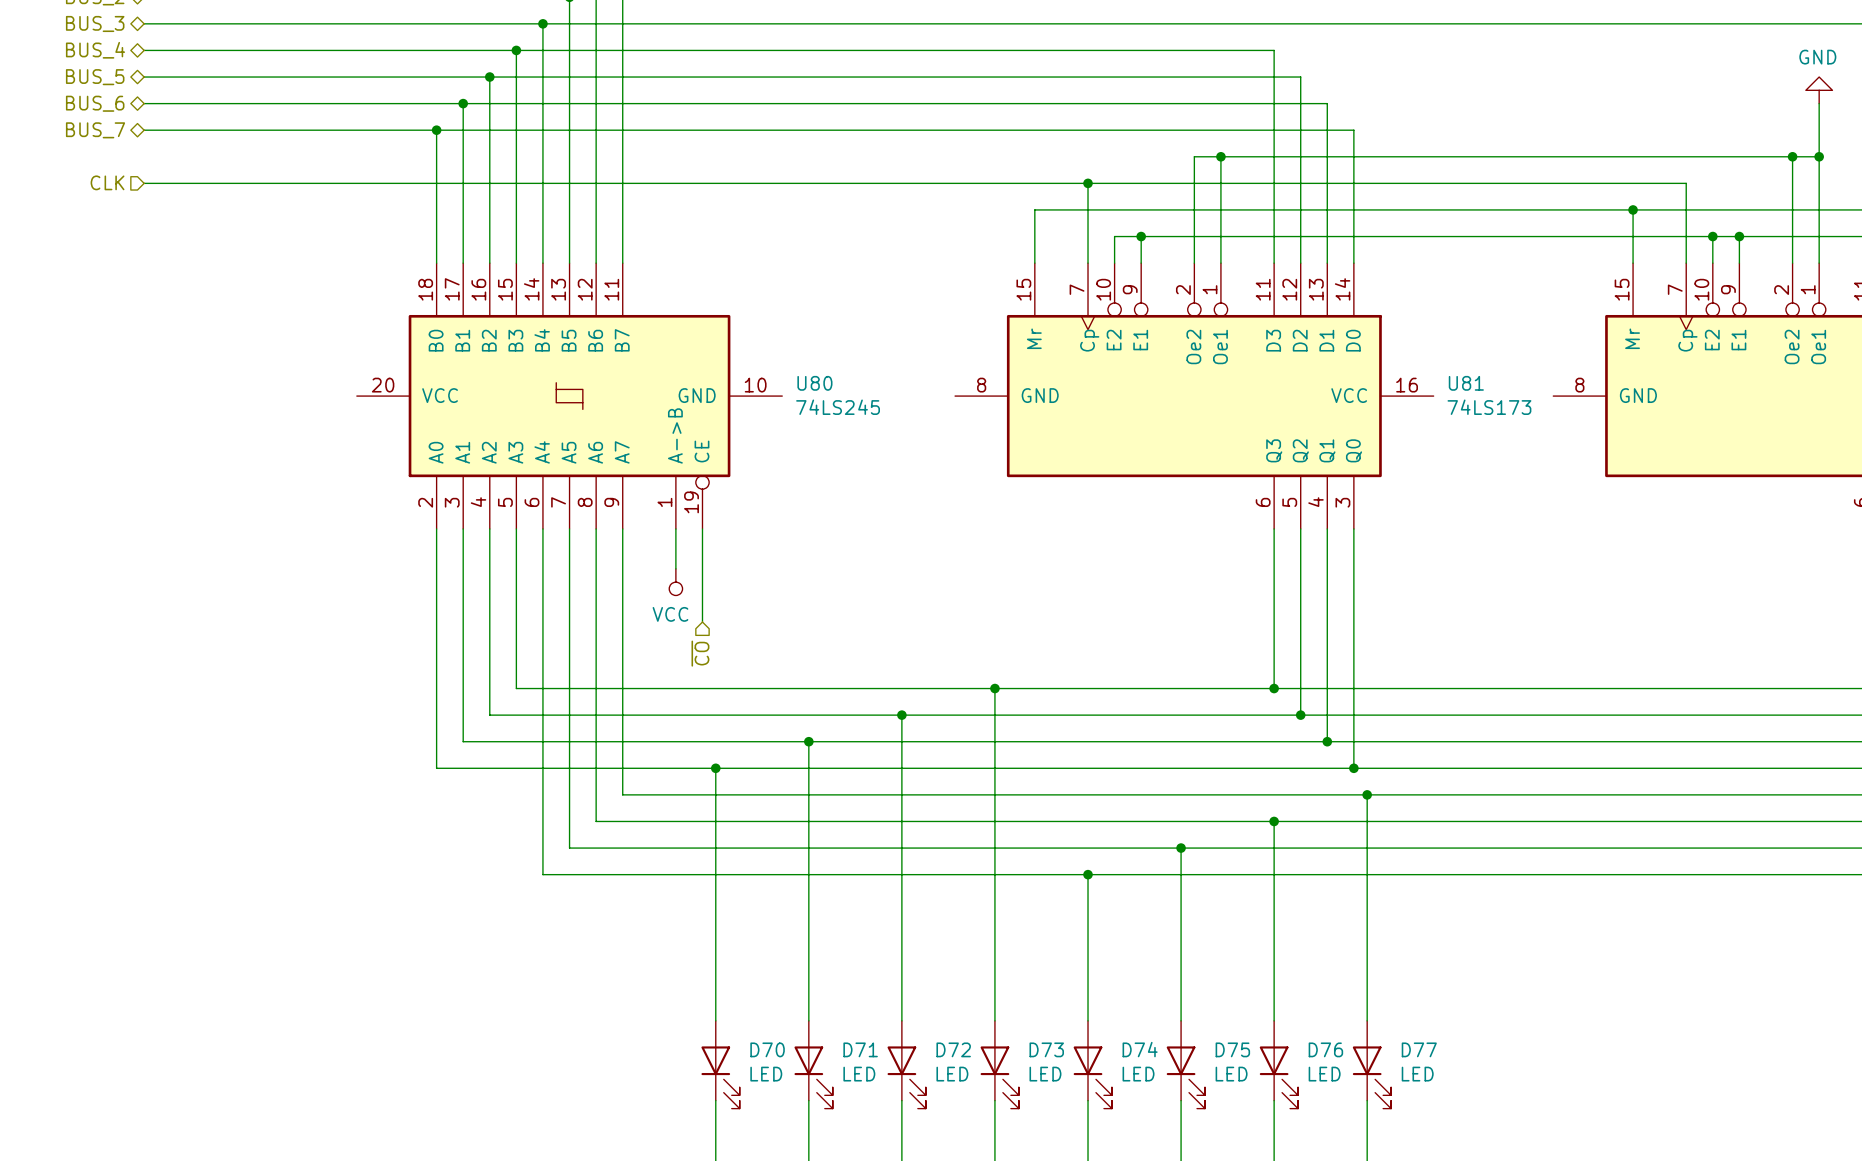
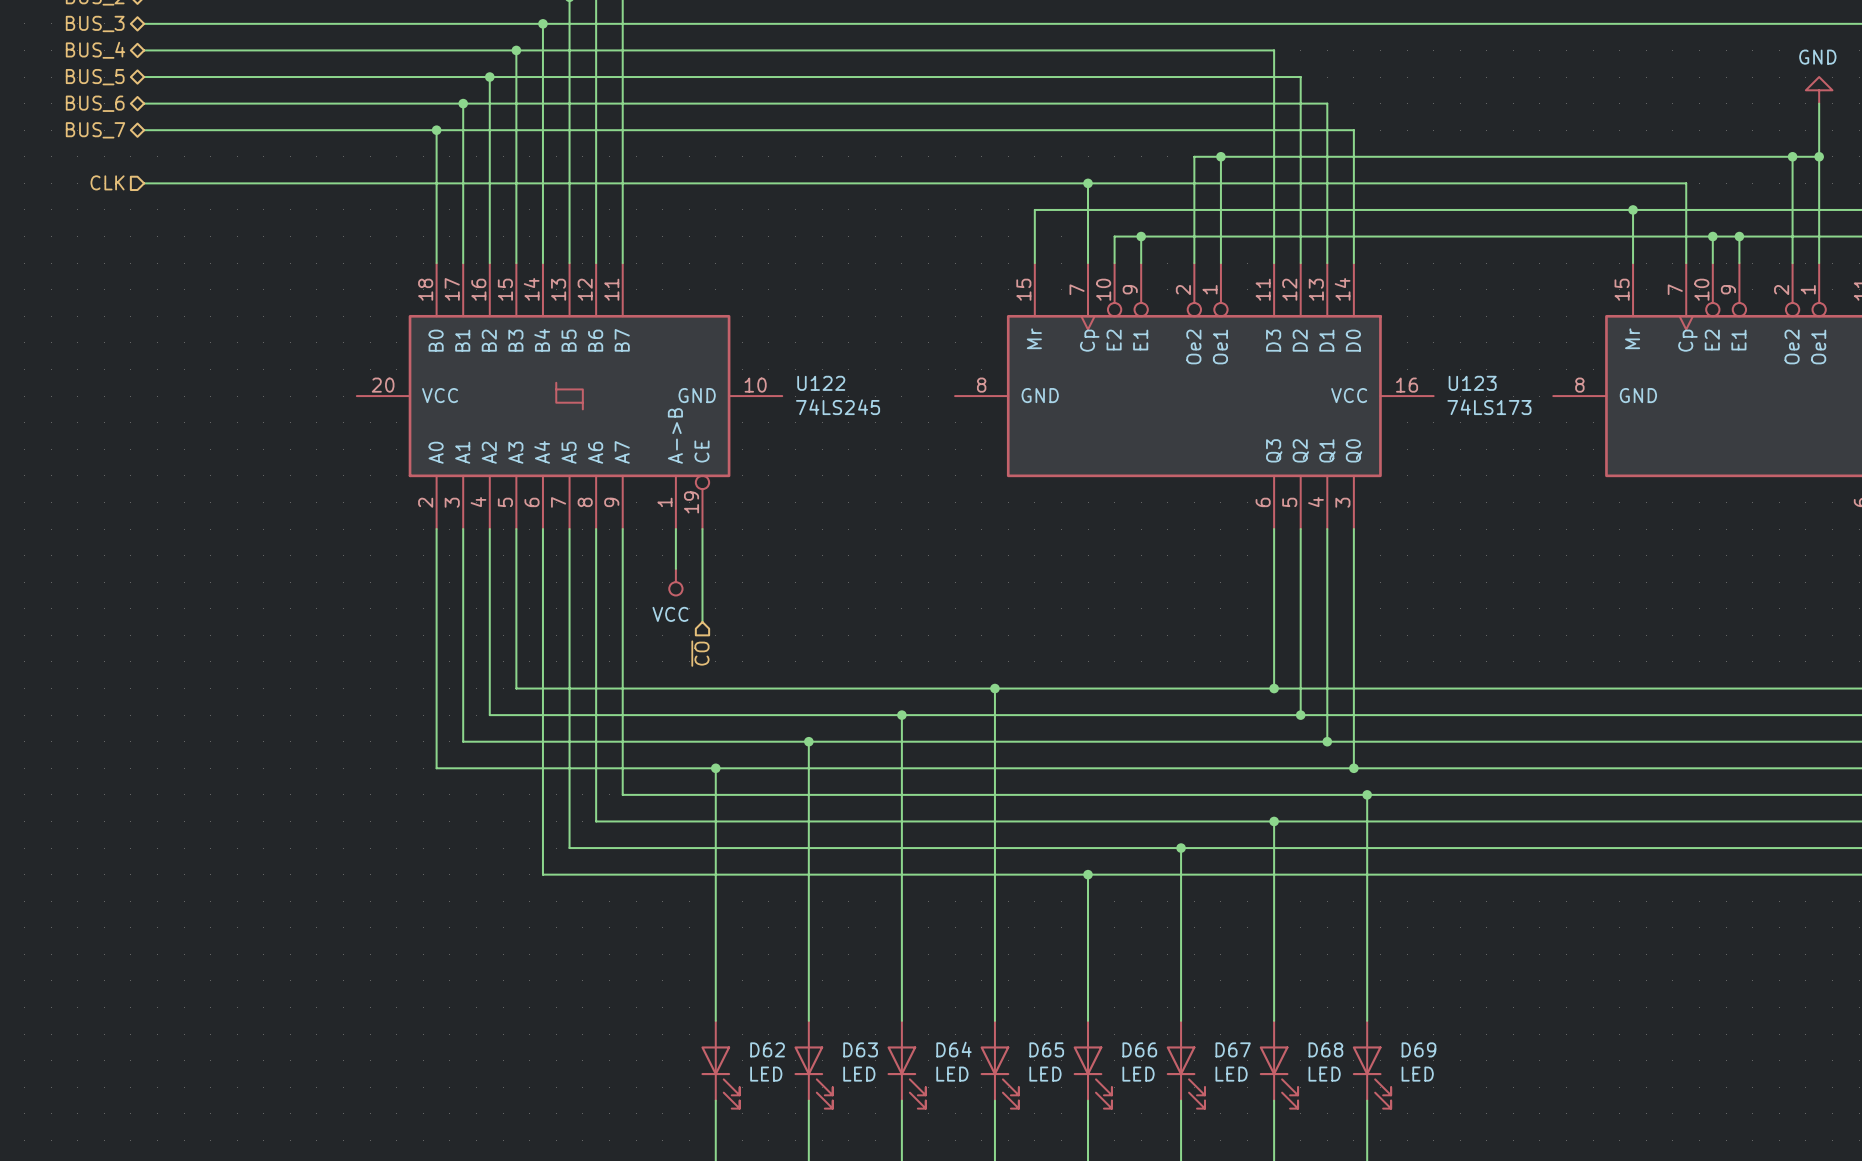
U80 name: U80 (814, 383) -> U122 (821, 383)
U81 name: U81 (1466, 383) -> U123 (1472, 383)
D70 name: D70 (767, 1049) -> D62 (767, 1049)
D71 name: D71 (860, 1049) -> D63 (860, 1049)
D72 name: D72 (953, 1049) -> D64 (953, 1049)
D73 name: D73 (1046, 1049) -> D65 (1046, 1049)
D74 name: D74 (1140, 1049) -> D66 (1139, 1049)
D75 name: D75 (1232, 1049) -> D67 (1233, 1049)
D76 name: D76 (1325, 1049) -> D68 (1325, 1049)
D77 name: D77 (1419, 1049) -> D69 (1418, 1049)

